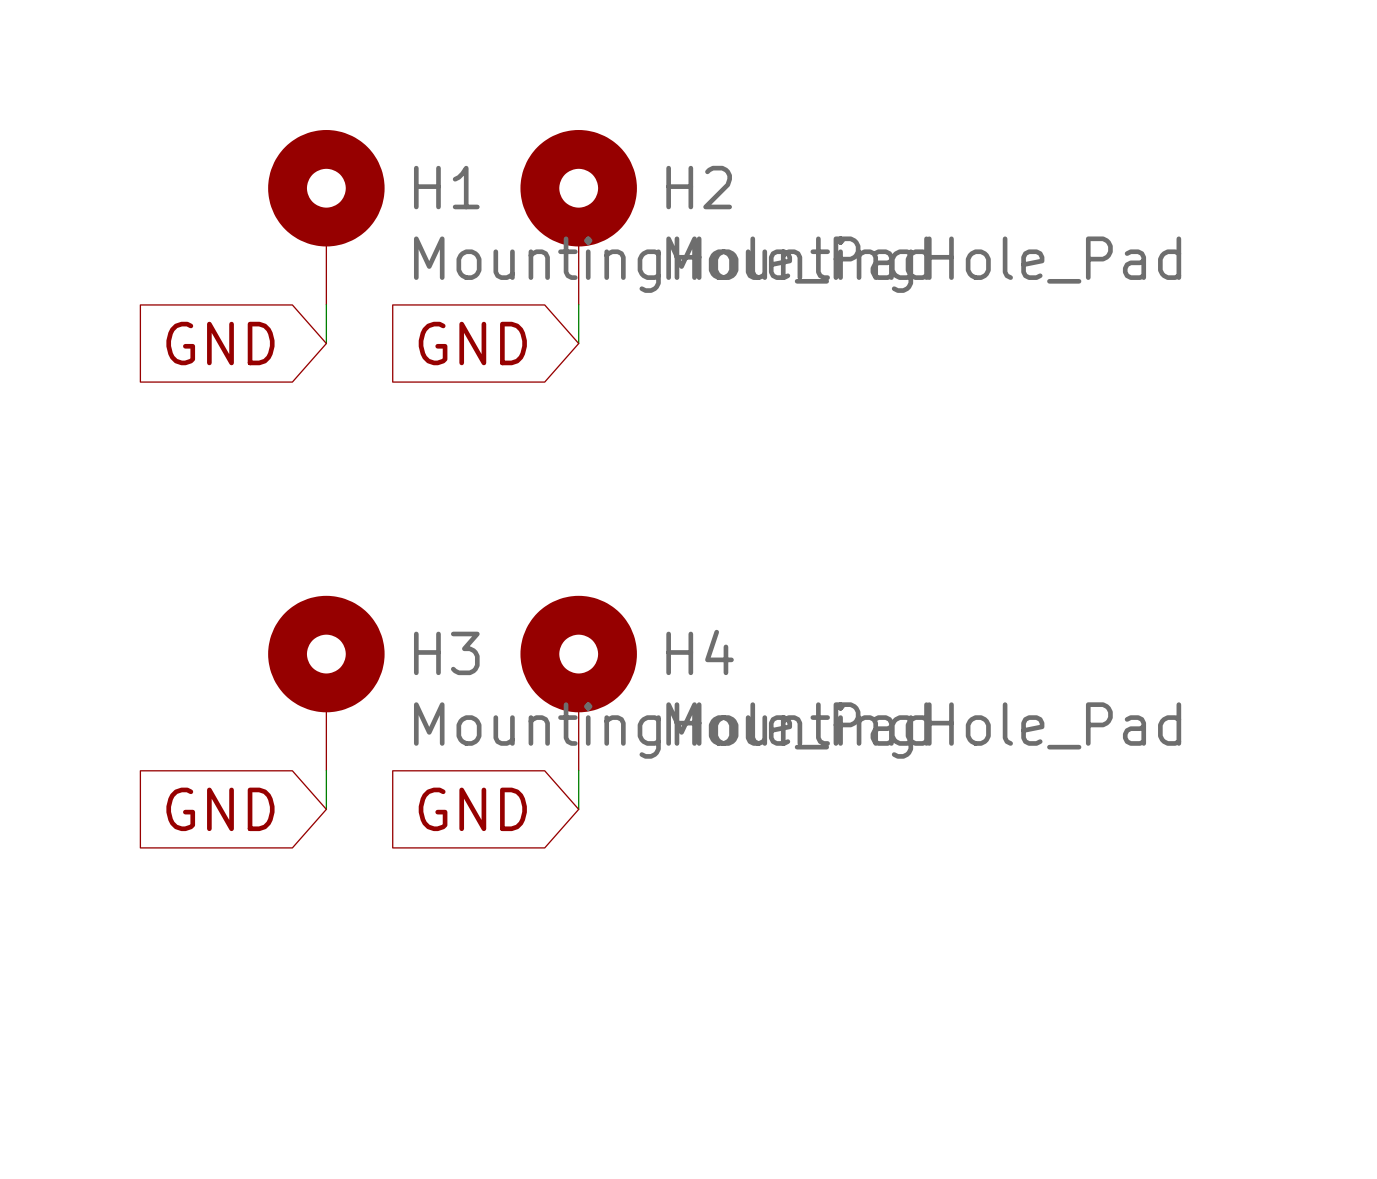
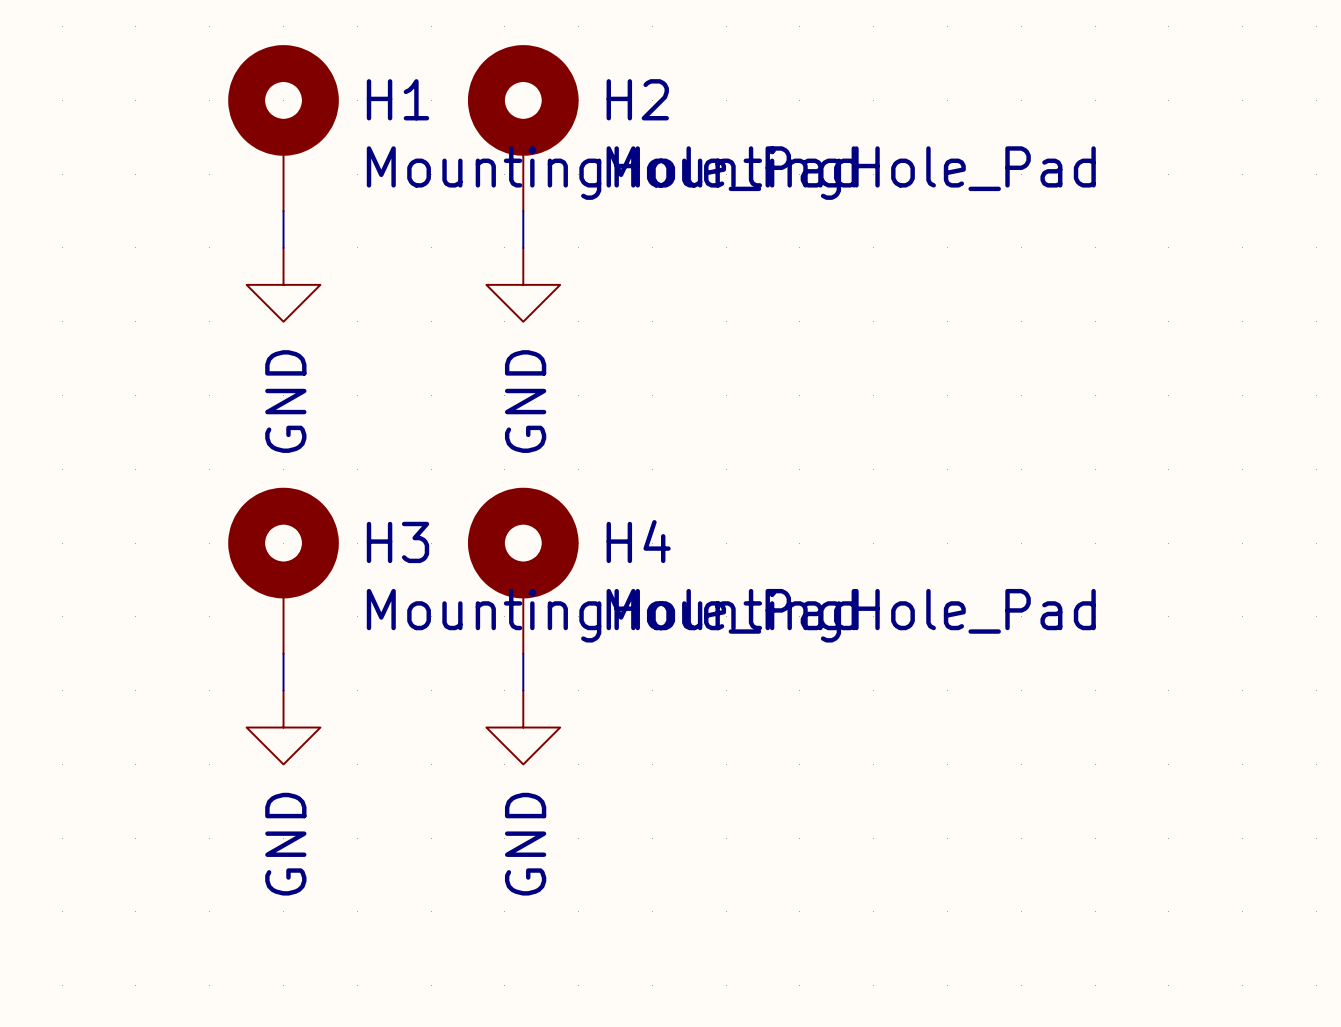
global label: GND (220, 343) -> none
global label: GND (472, 343) -> none
power symbol: none -> GND (283, 284)
power symbol: none -> GND (523, 284)
global label: GND (220, 809) -> none
global label: GND (472, 809) -> none
power symbol: none -> GND (283, 727)
power symbol: none -> GND (523, 727)

